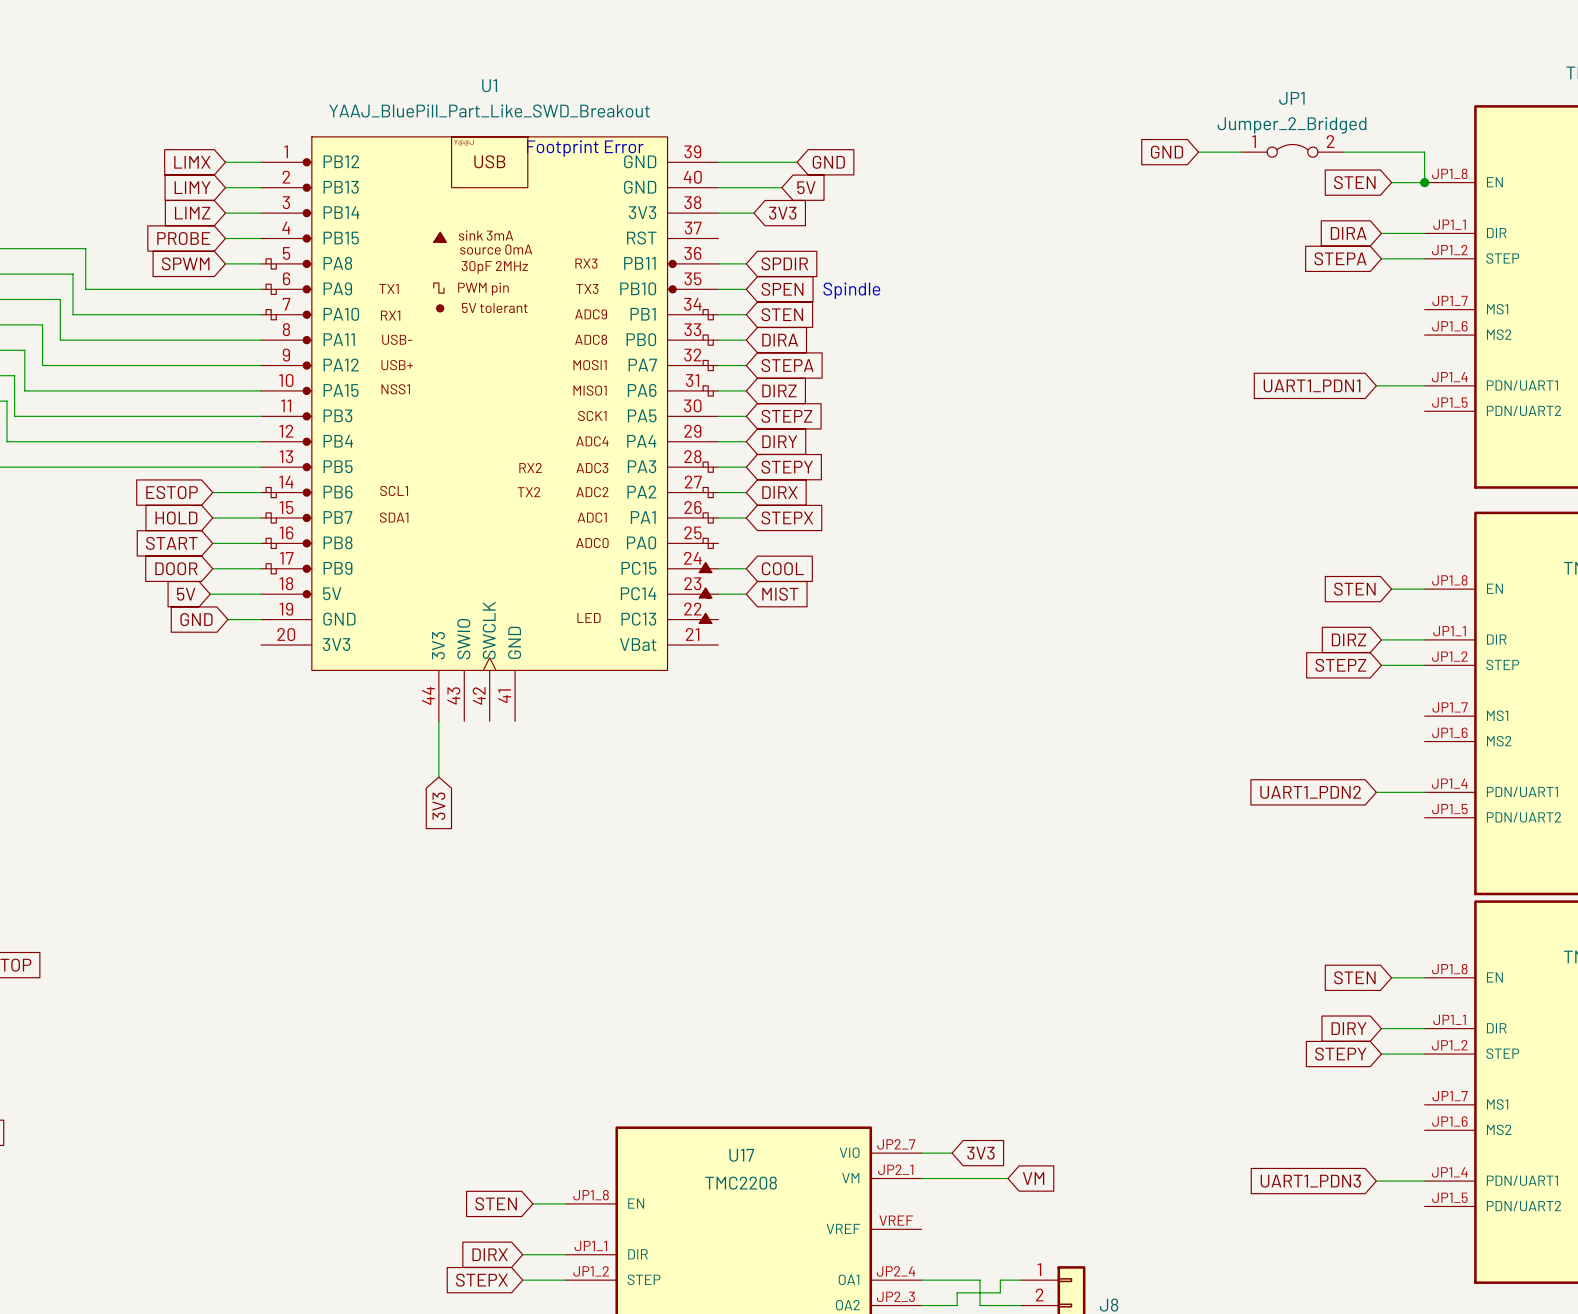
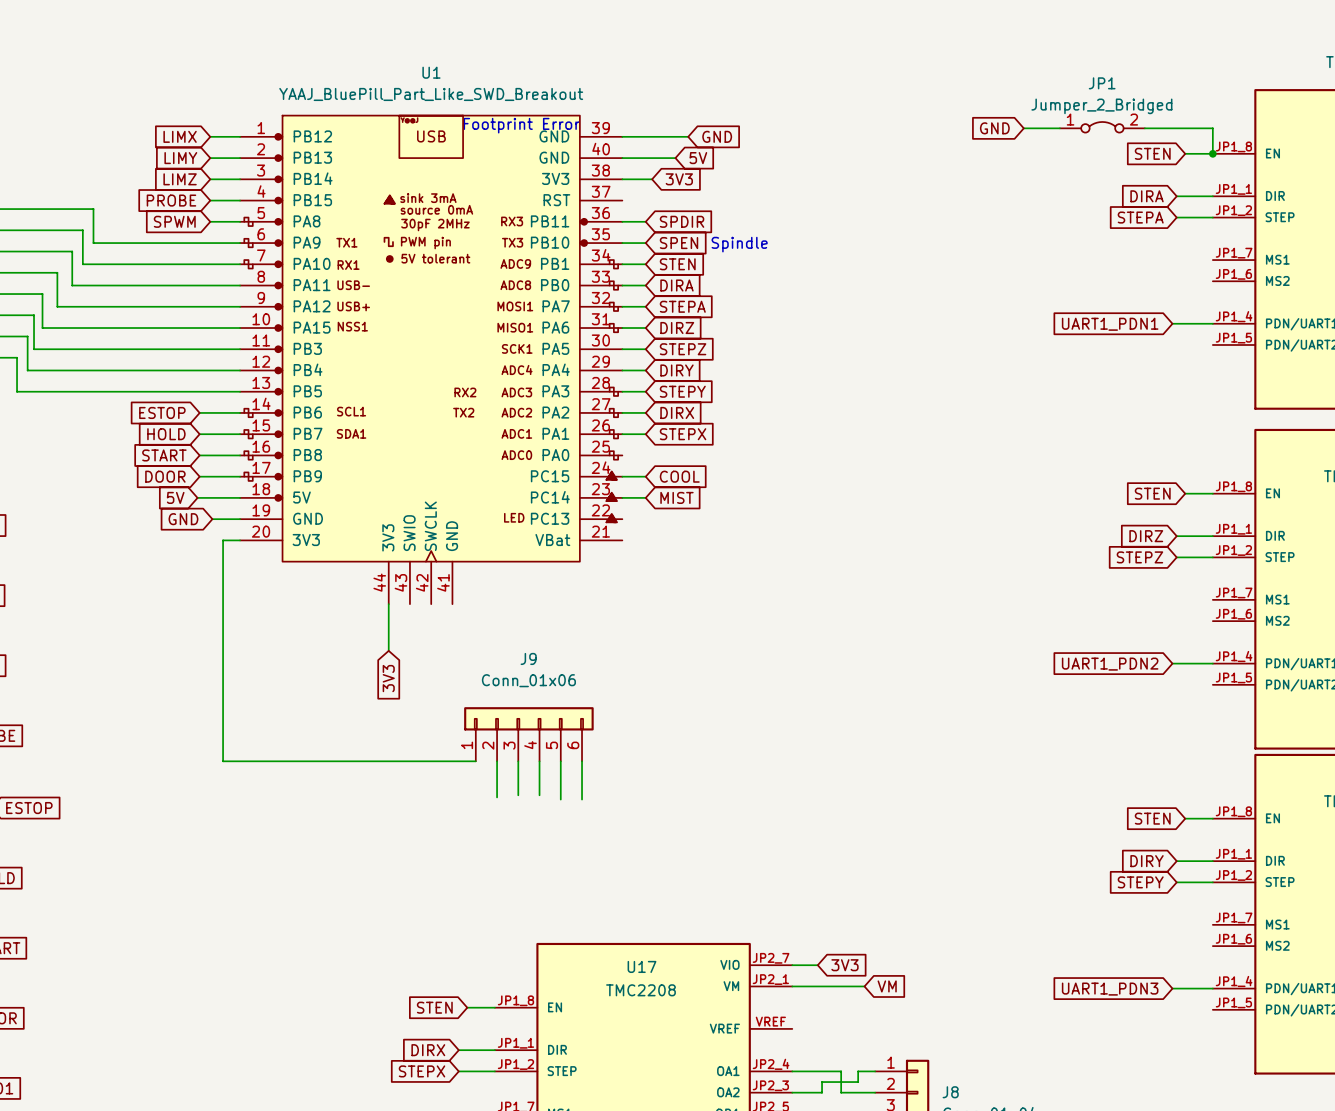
wire: none -> (240, 540) (223, 540) (223, 761) (475, 761)
J9: none -> Conn_01x06 (528, 734)
wire: none -> (497, 761) (497, 797)
wire: none -> (518, 761) (518, 795)
wire: none -> (539, 761) (539, 795)
wire: none -> (560, 761) (560, 799)
wire: none -> (582, 761) (582, 799)

